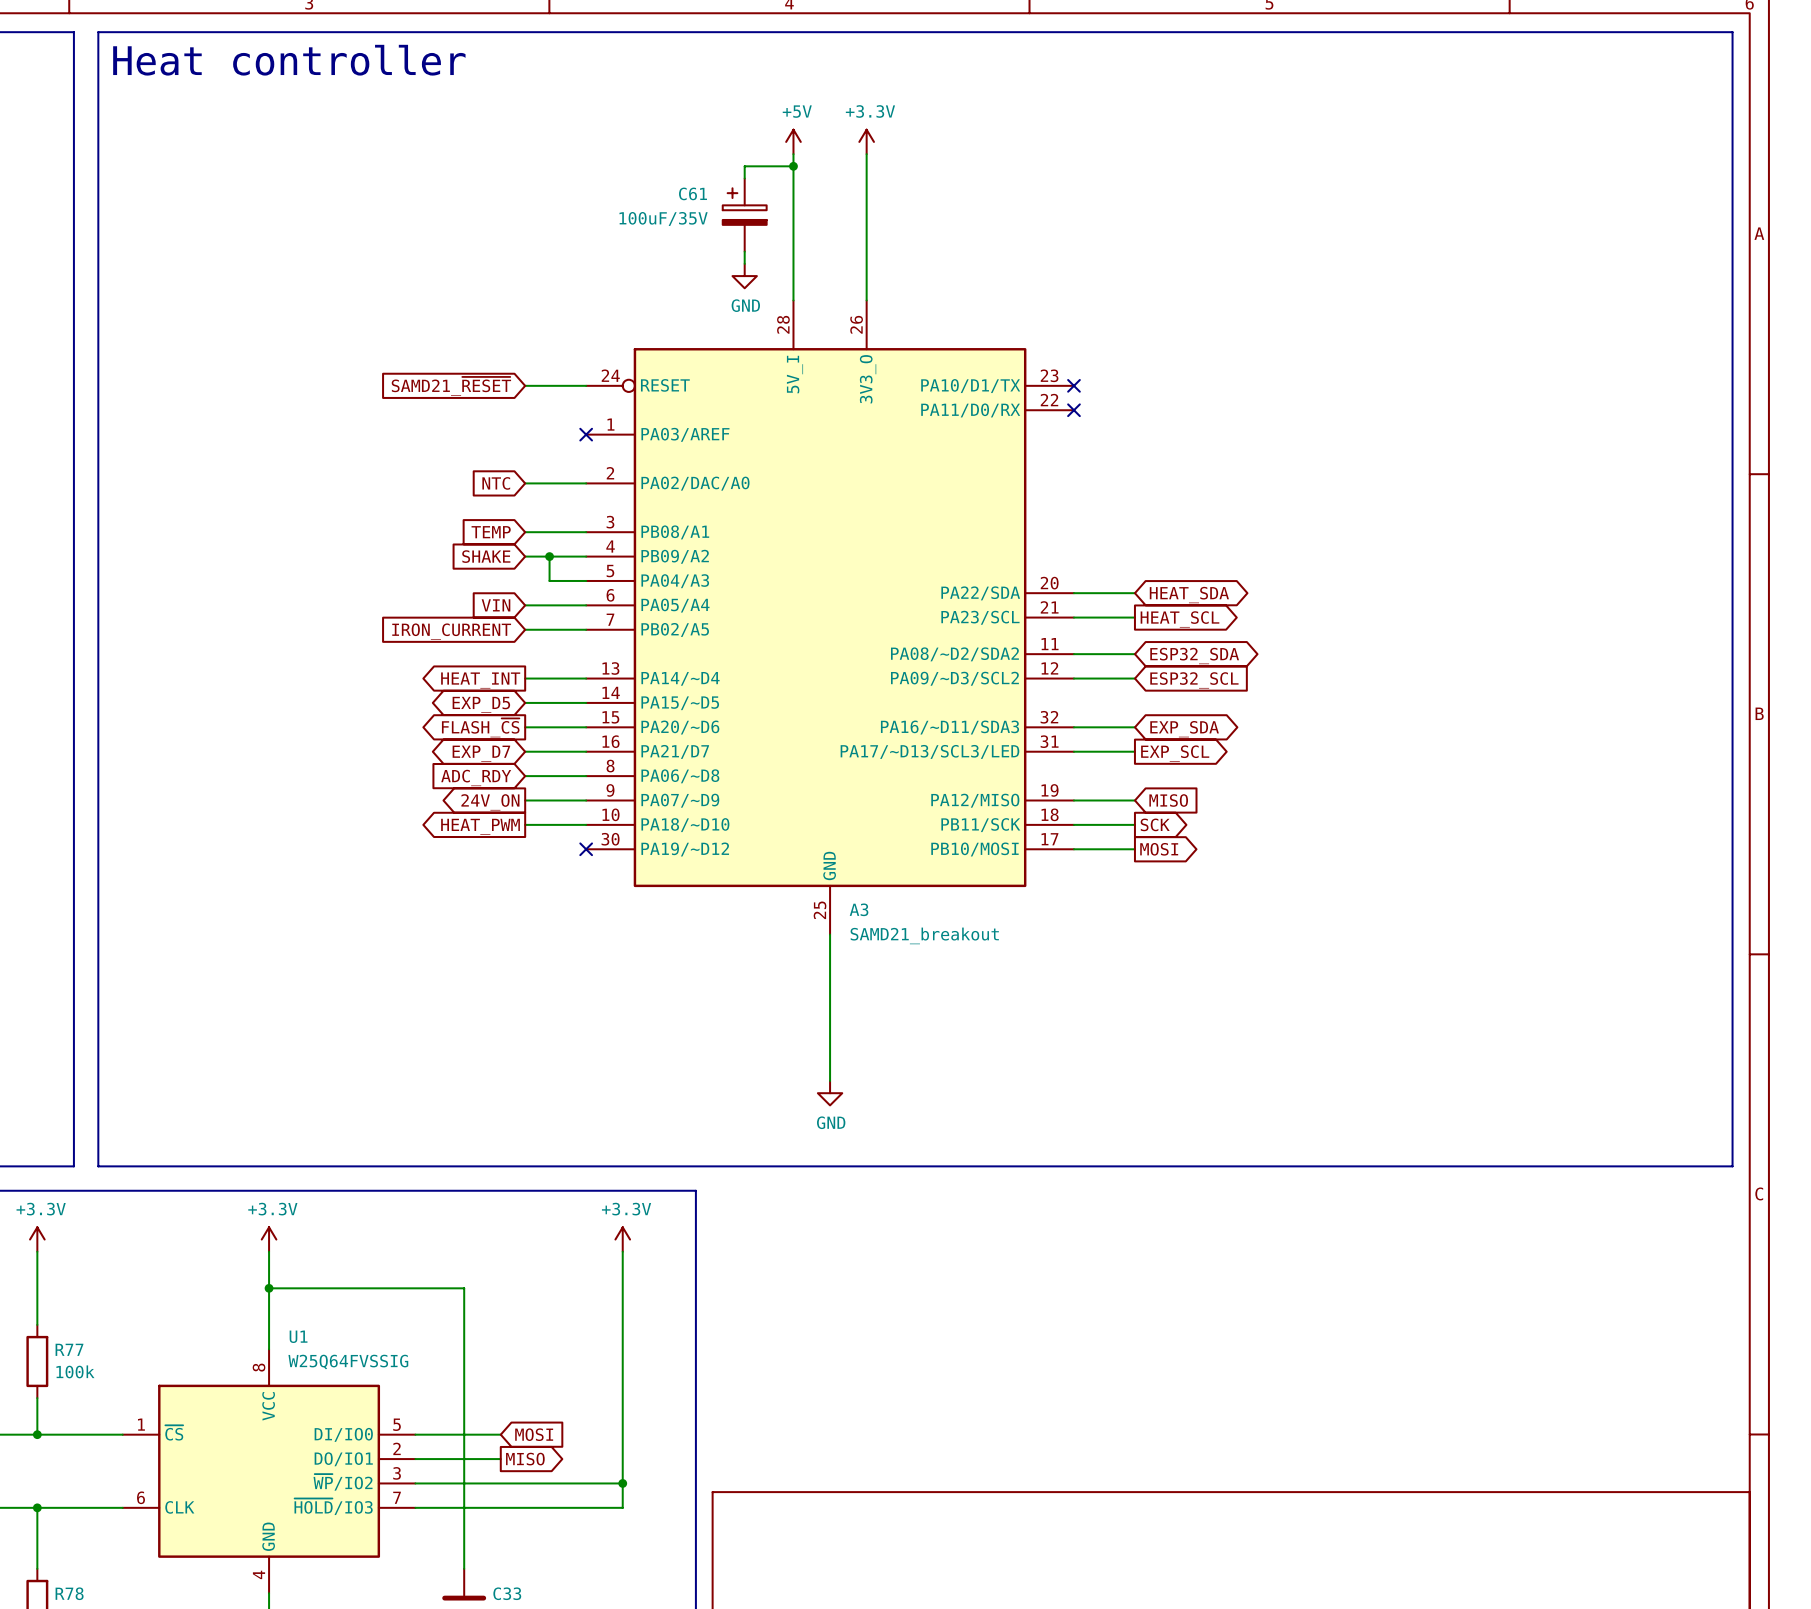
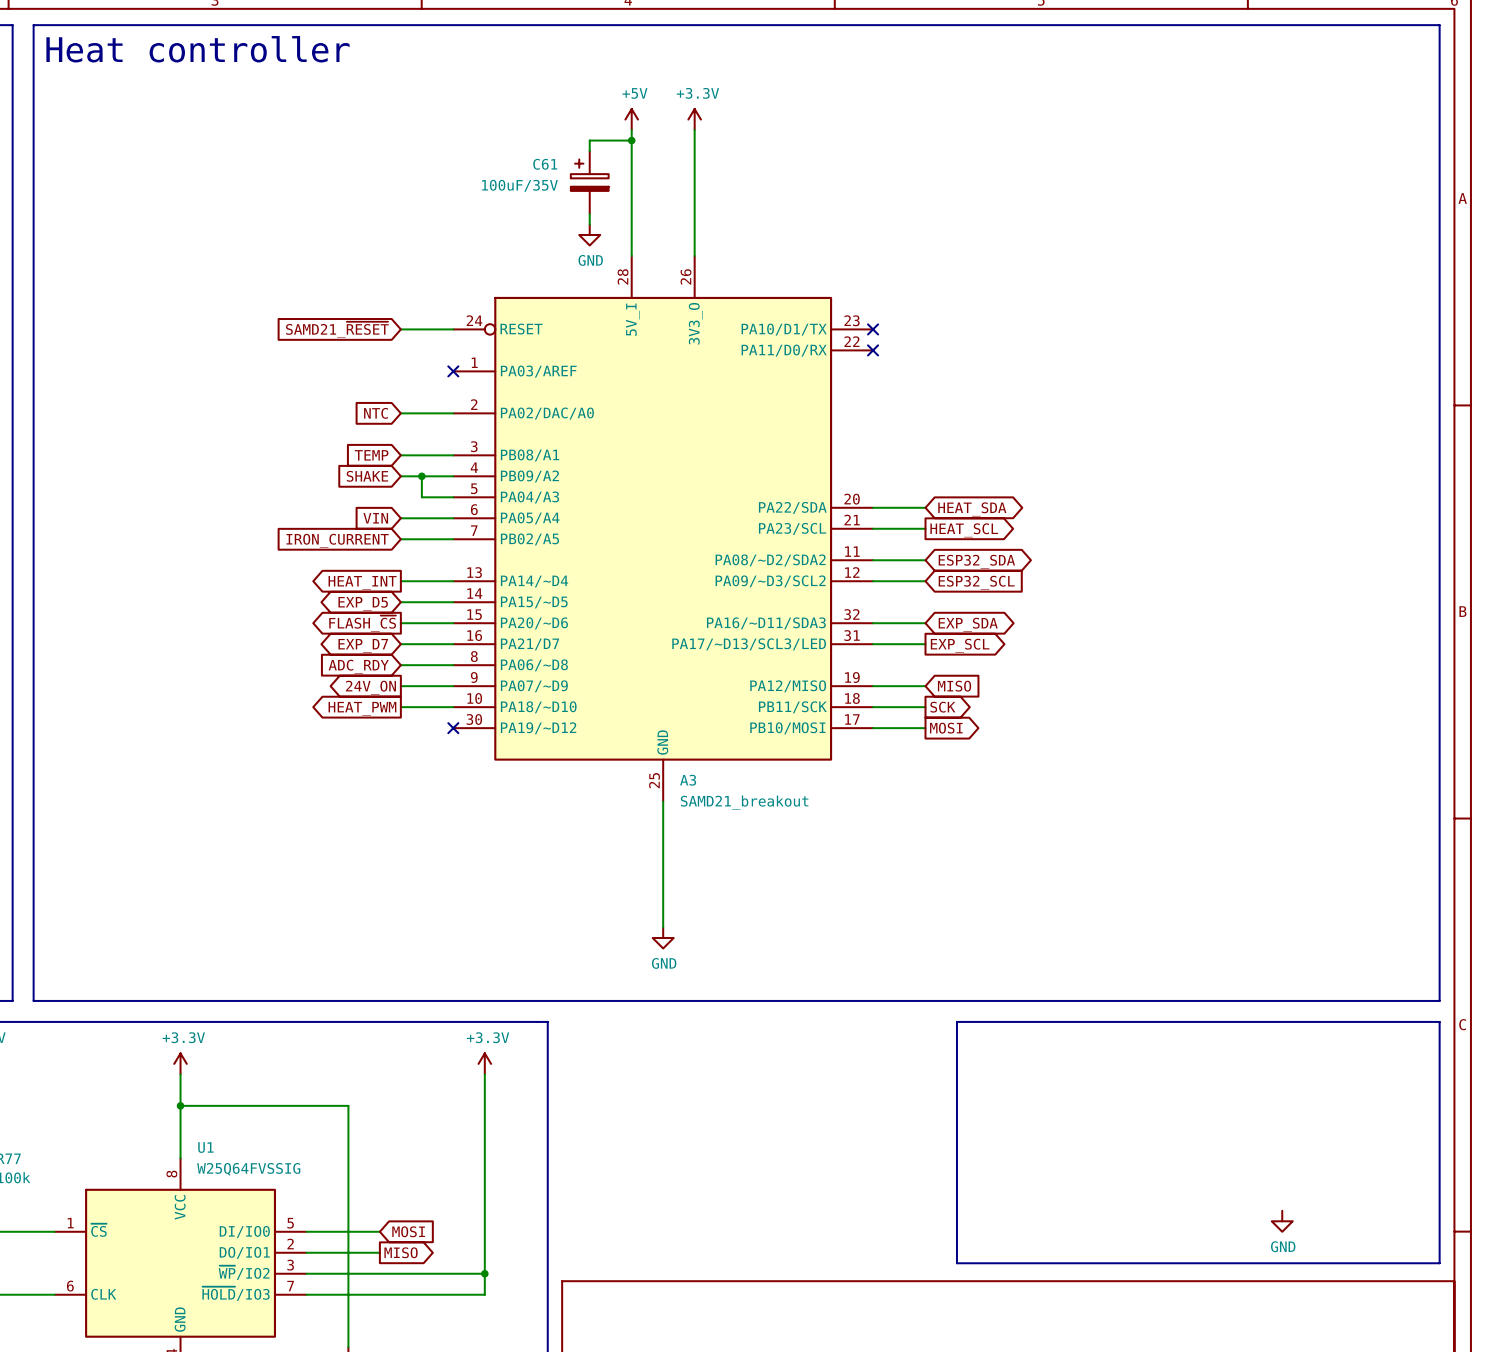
line: none -> (956, 1021) (1439, 1021) (1439, 1263) (956, 1263) (956, 1021)
power symbol: none -> GND (1282, 1221)

